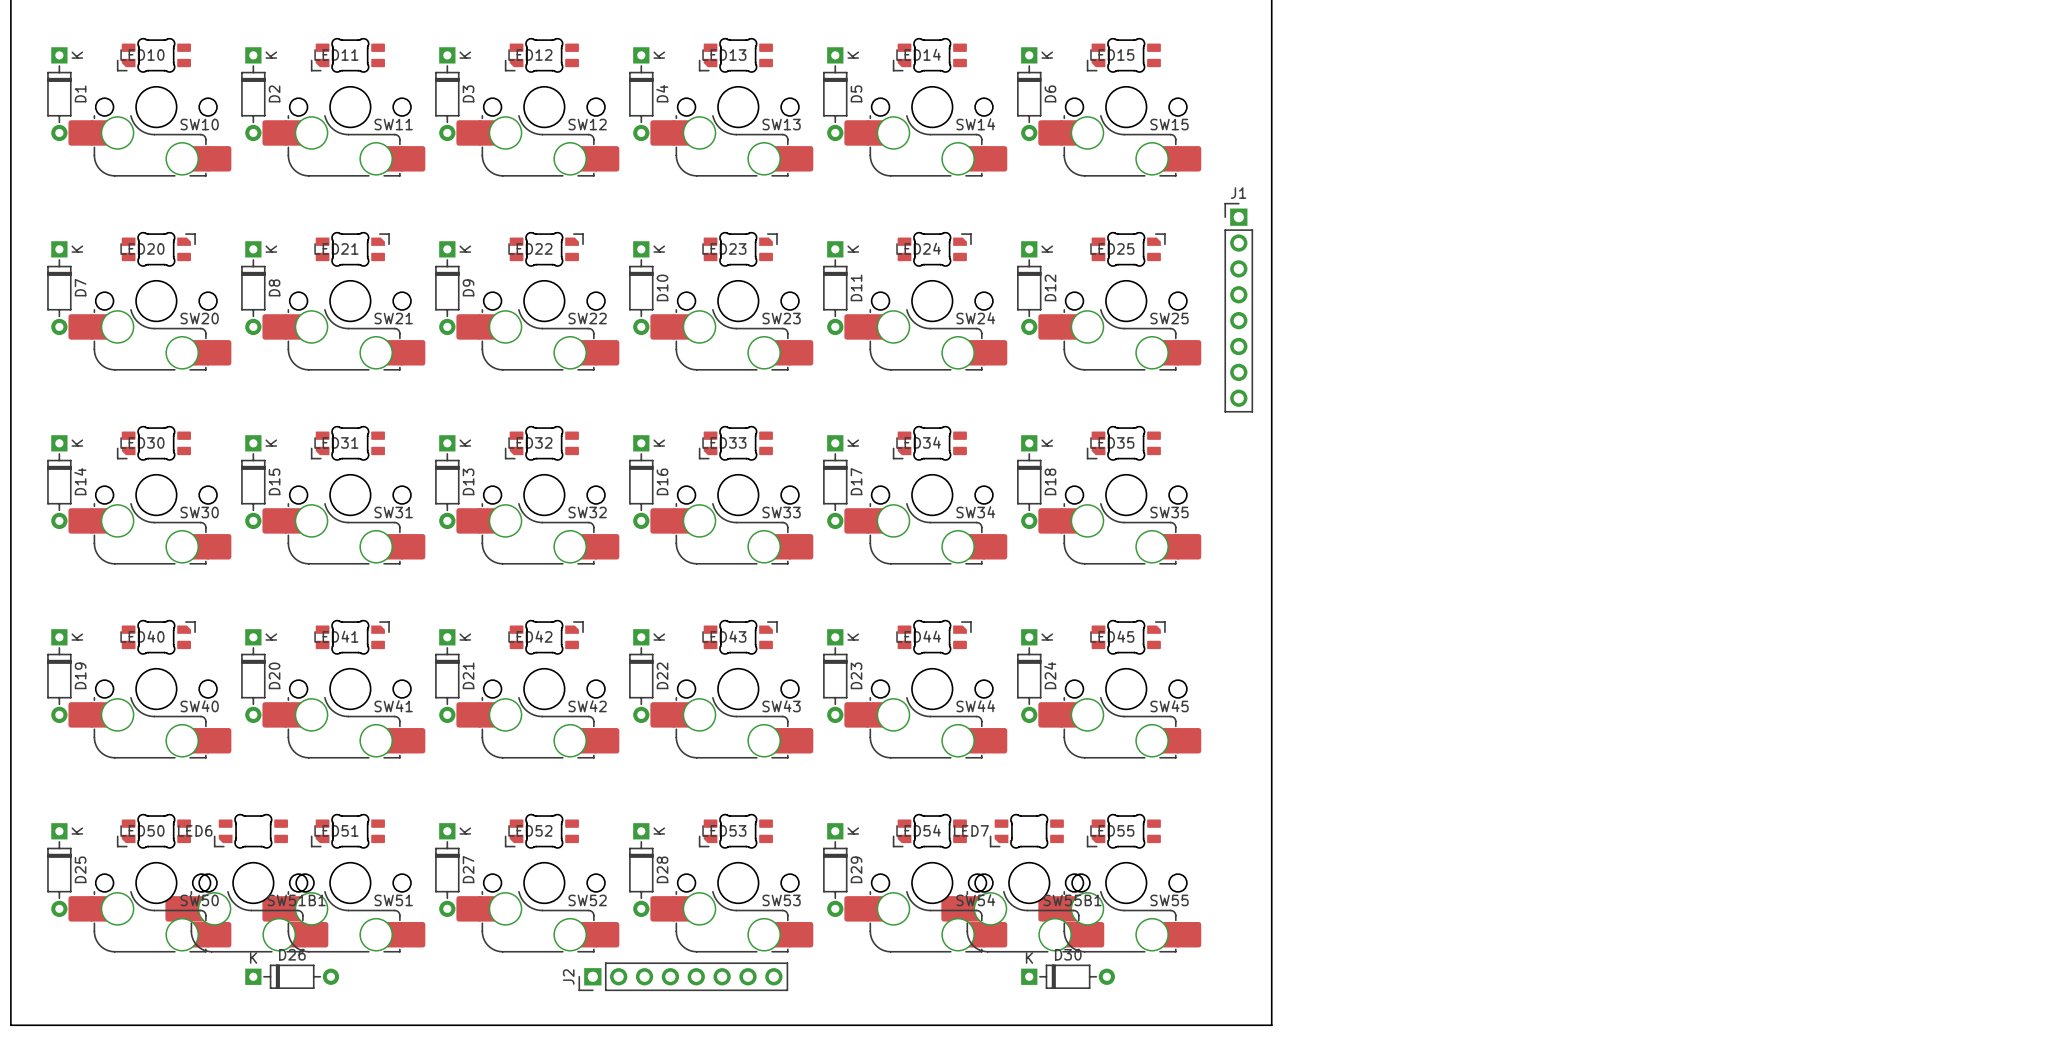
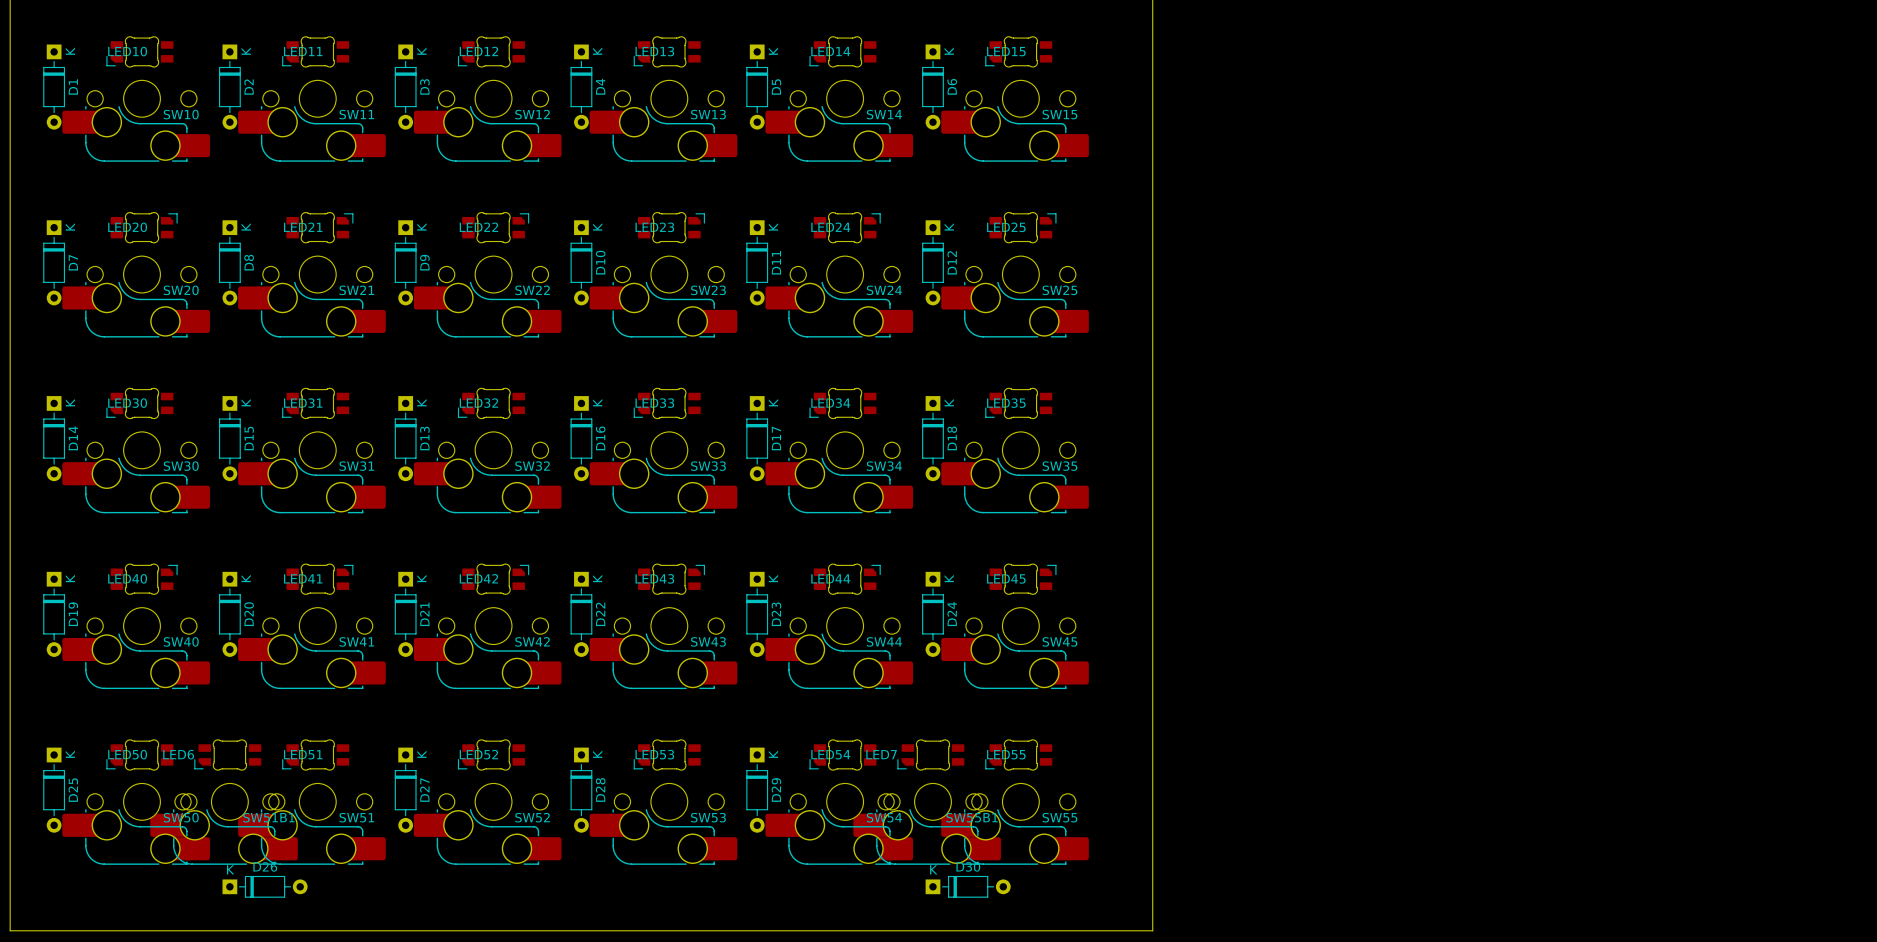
J1: (1238, 307) -> none
J2: (683, 976) -> none

